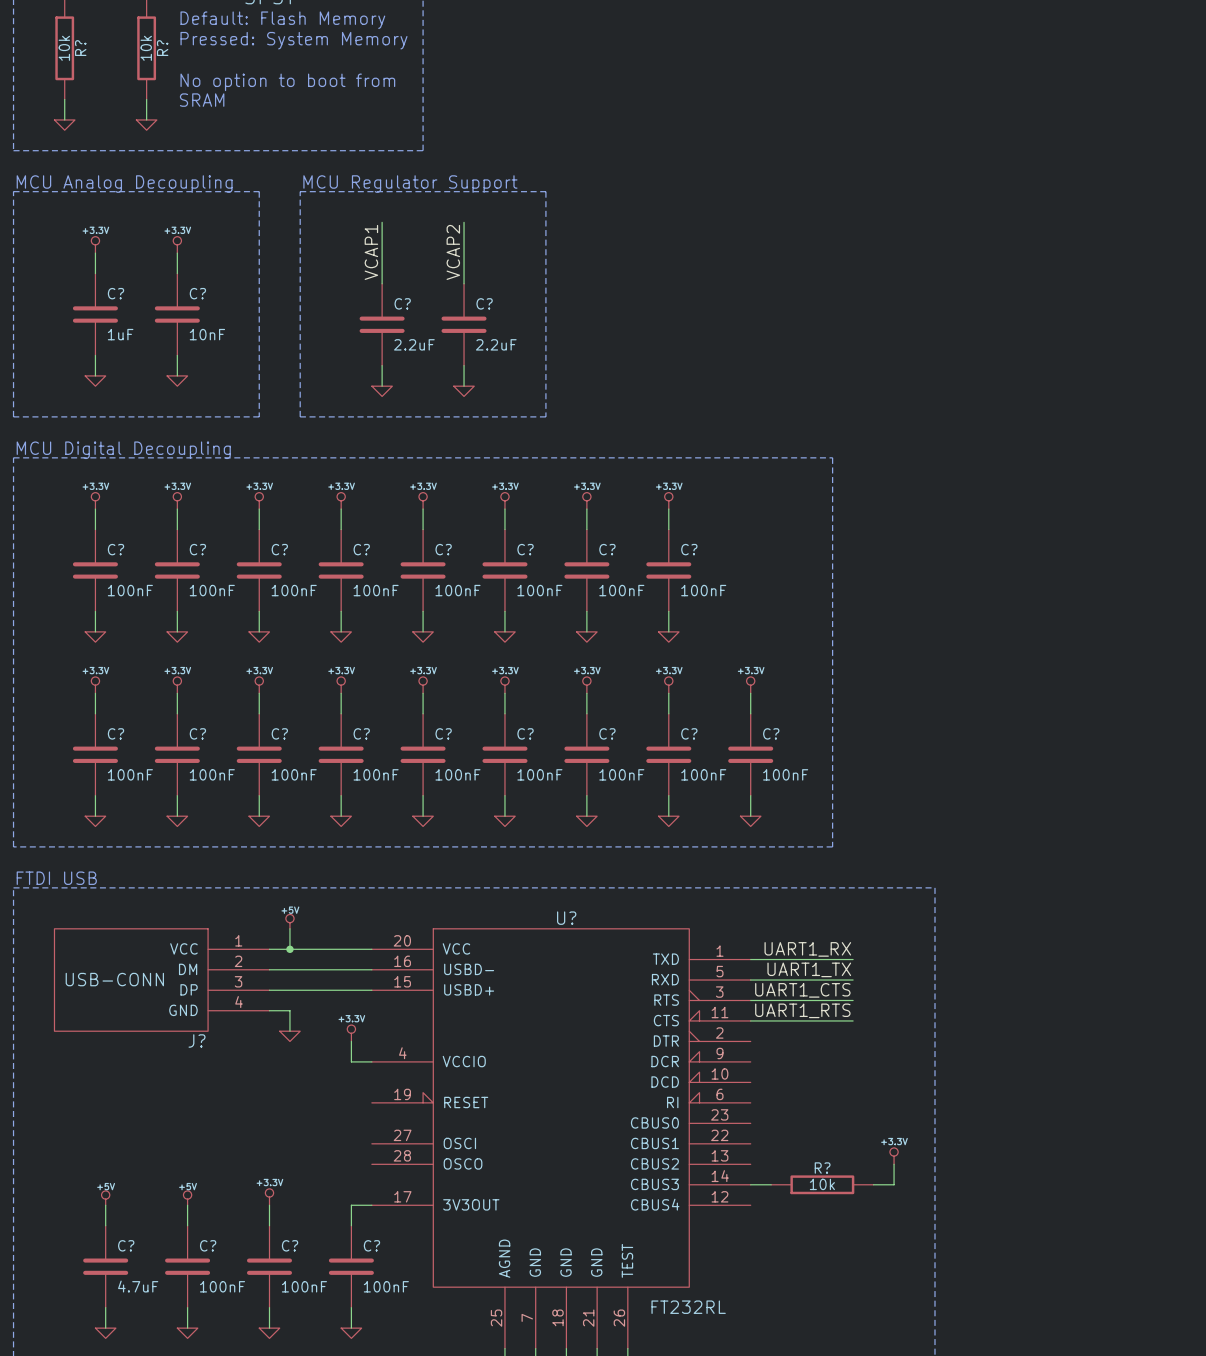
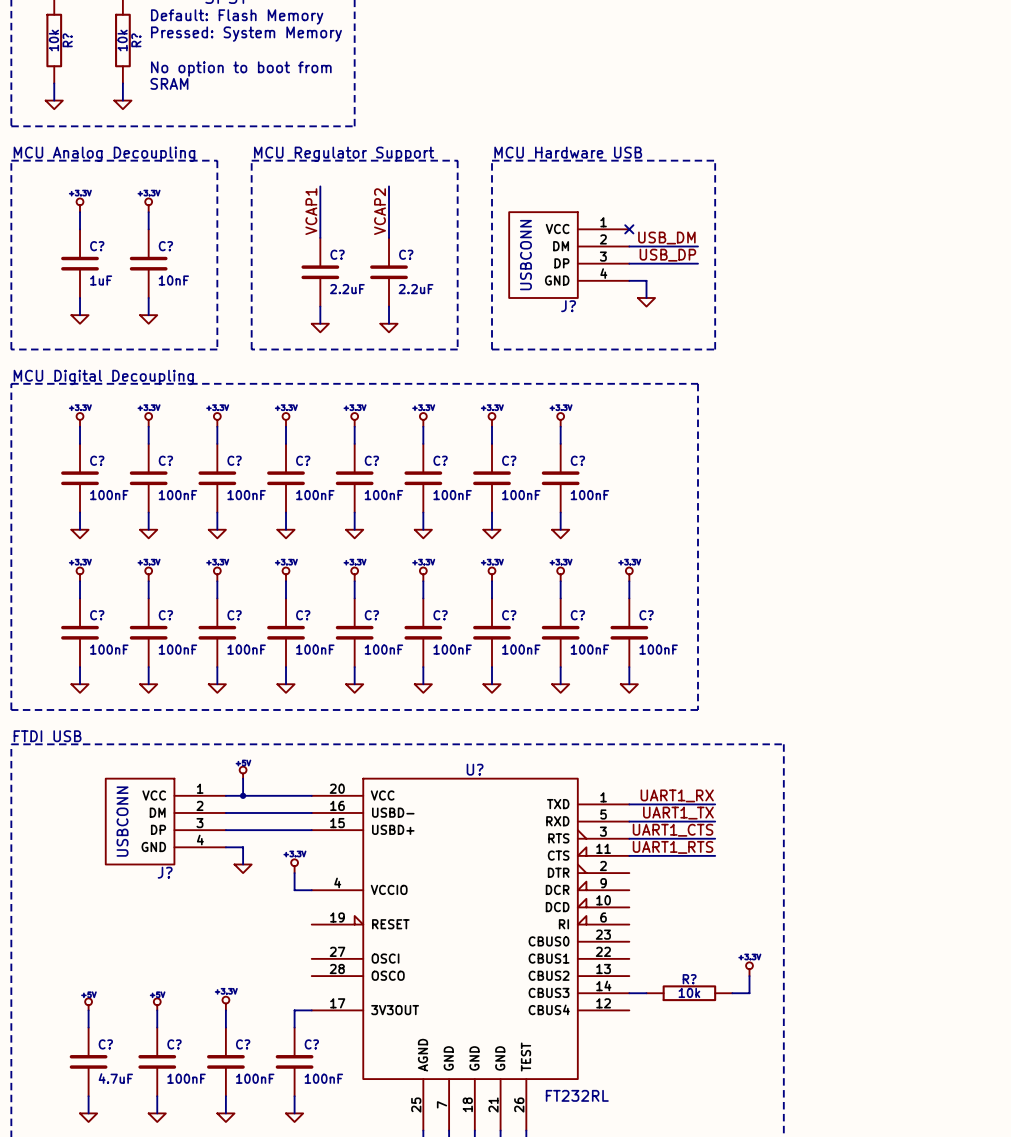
text: none -> MCU Hardware USB (568, 152)
line: none -> (492, 160) (715, 160) (715, 349) (492, 349) (492, 160)
no-connect mark: none -> (629, 229)
label: none -> USB_DM (666, 238)
wire: none -> (629, 246) (697, 246)
J?: none -> USBCONN (569, 255)
label: none -> USB_DP (667, 255)
wire: none -> (629, 263) (697, 263)
wire: none -> (629, 280) (646, 280) (646, 297)
power symbol: none -> (646, 302)
J?: USB-CONN (161, 980) -> none
J?: none -> USBCONN (165, 821)

